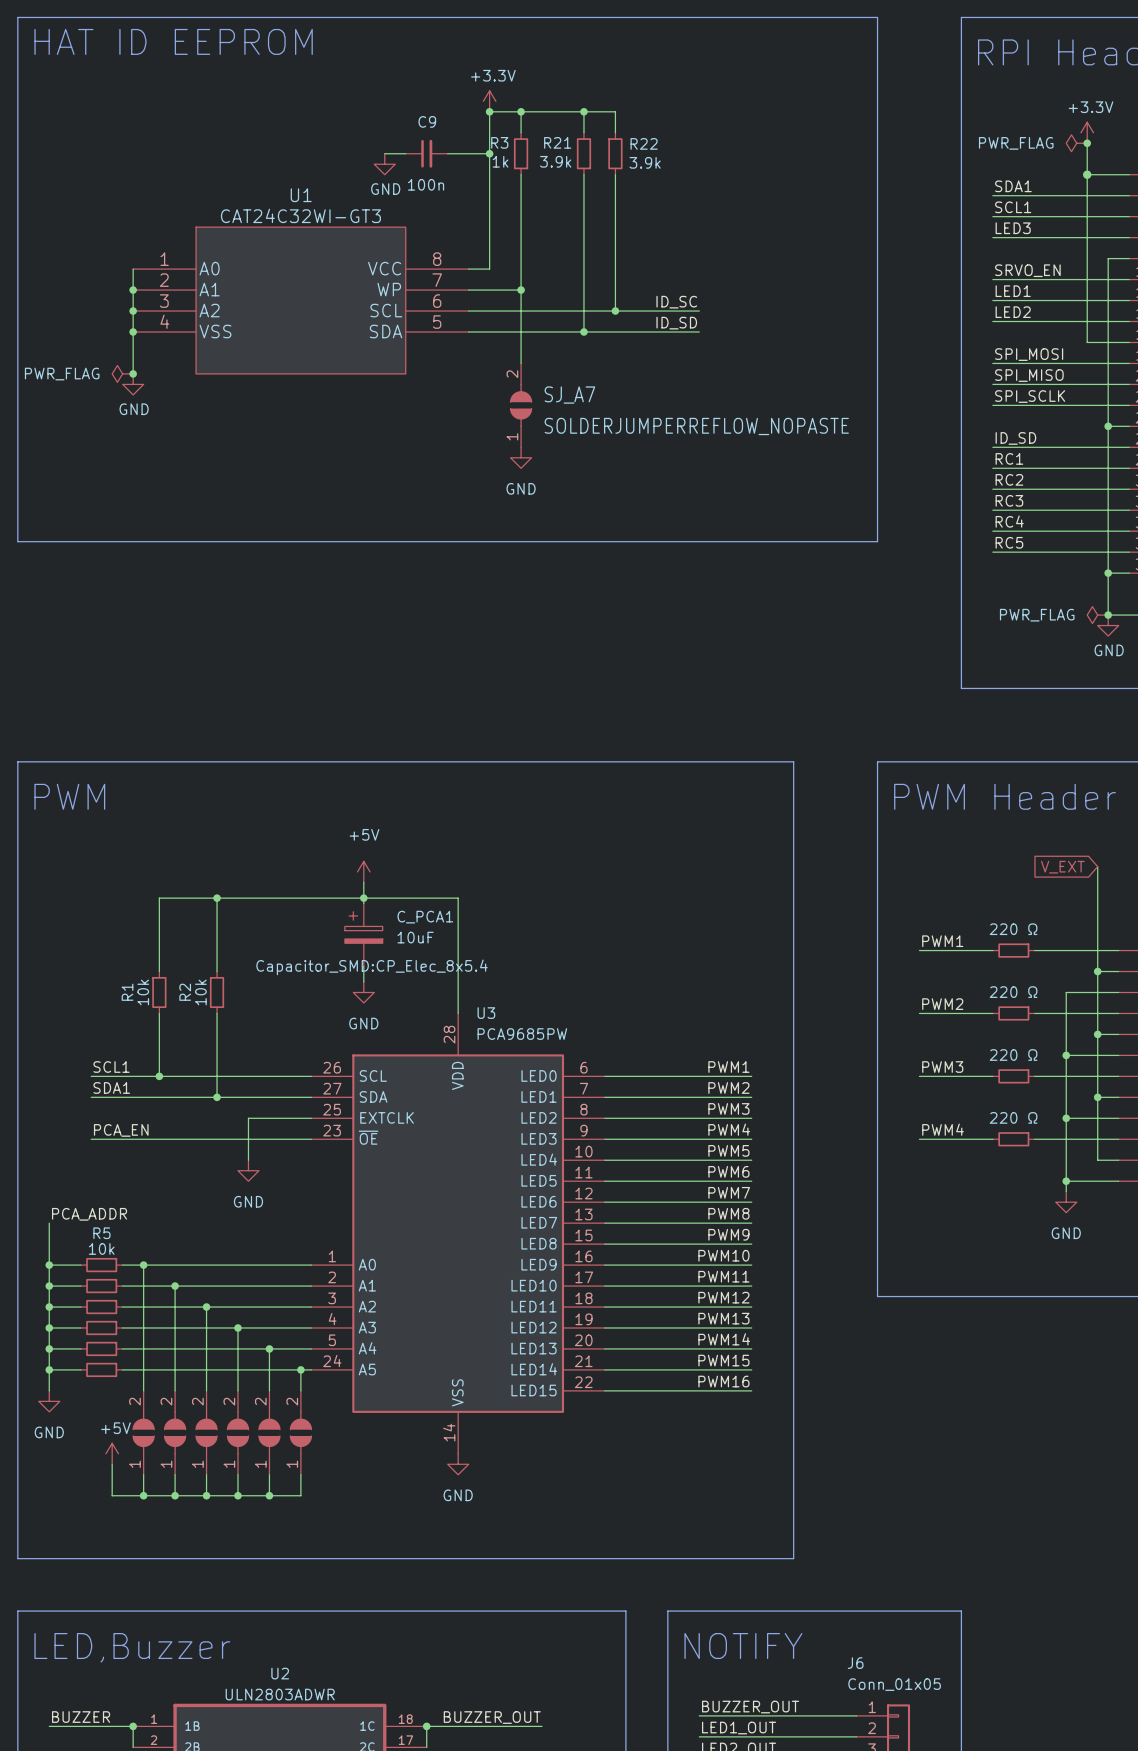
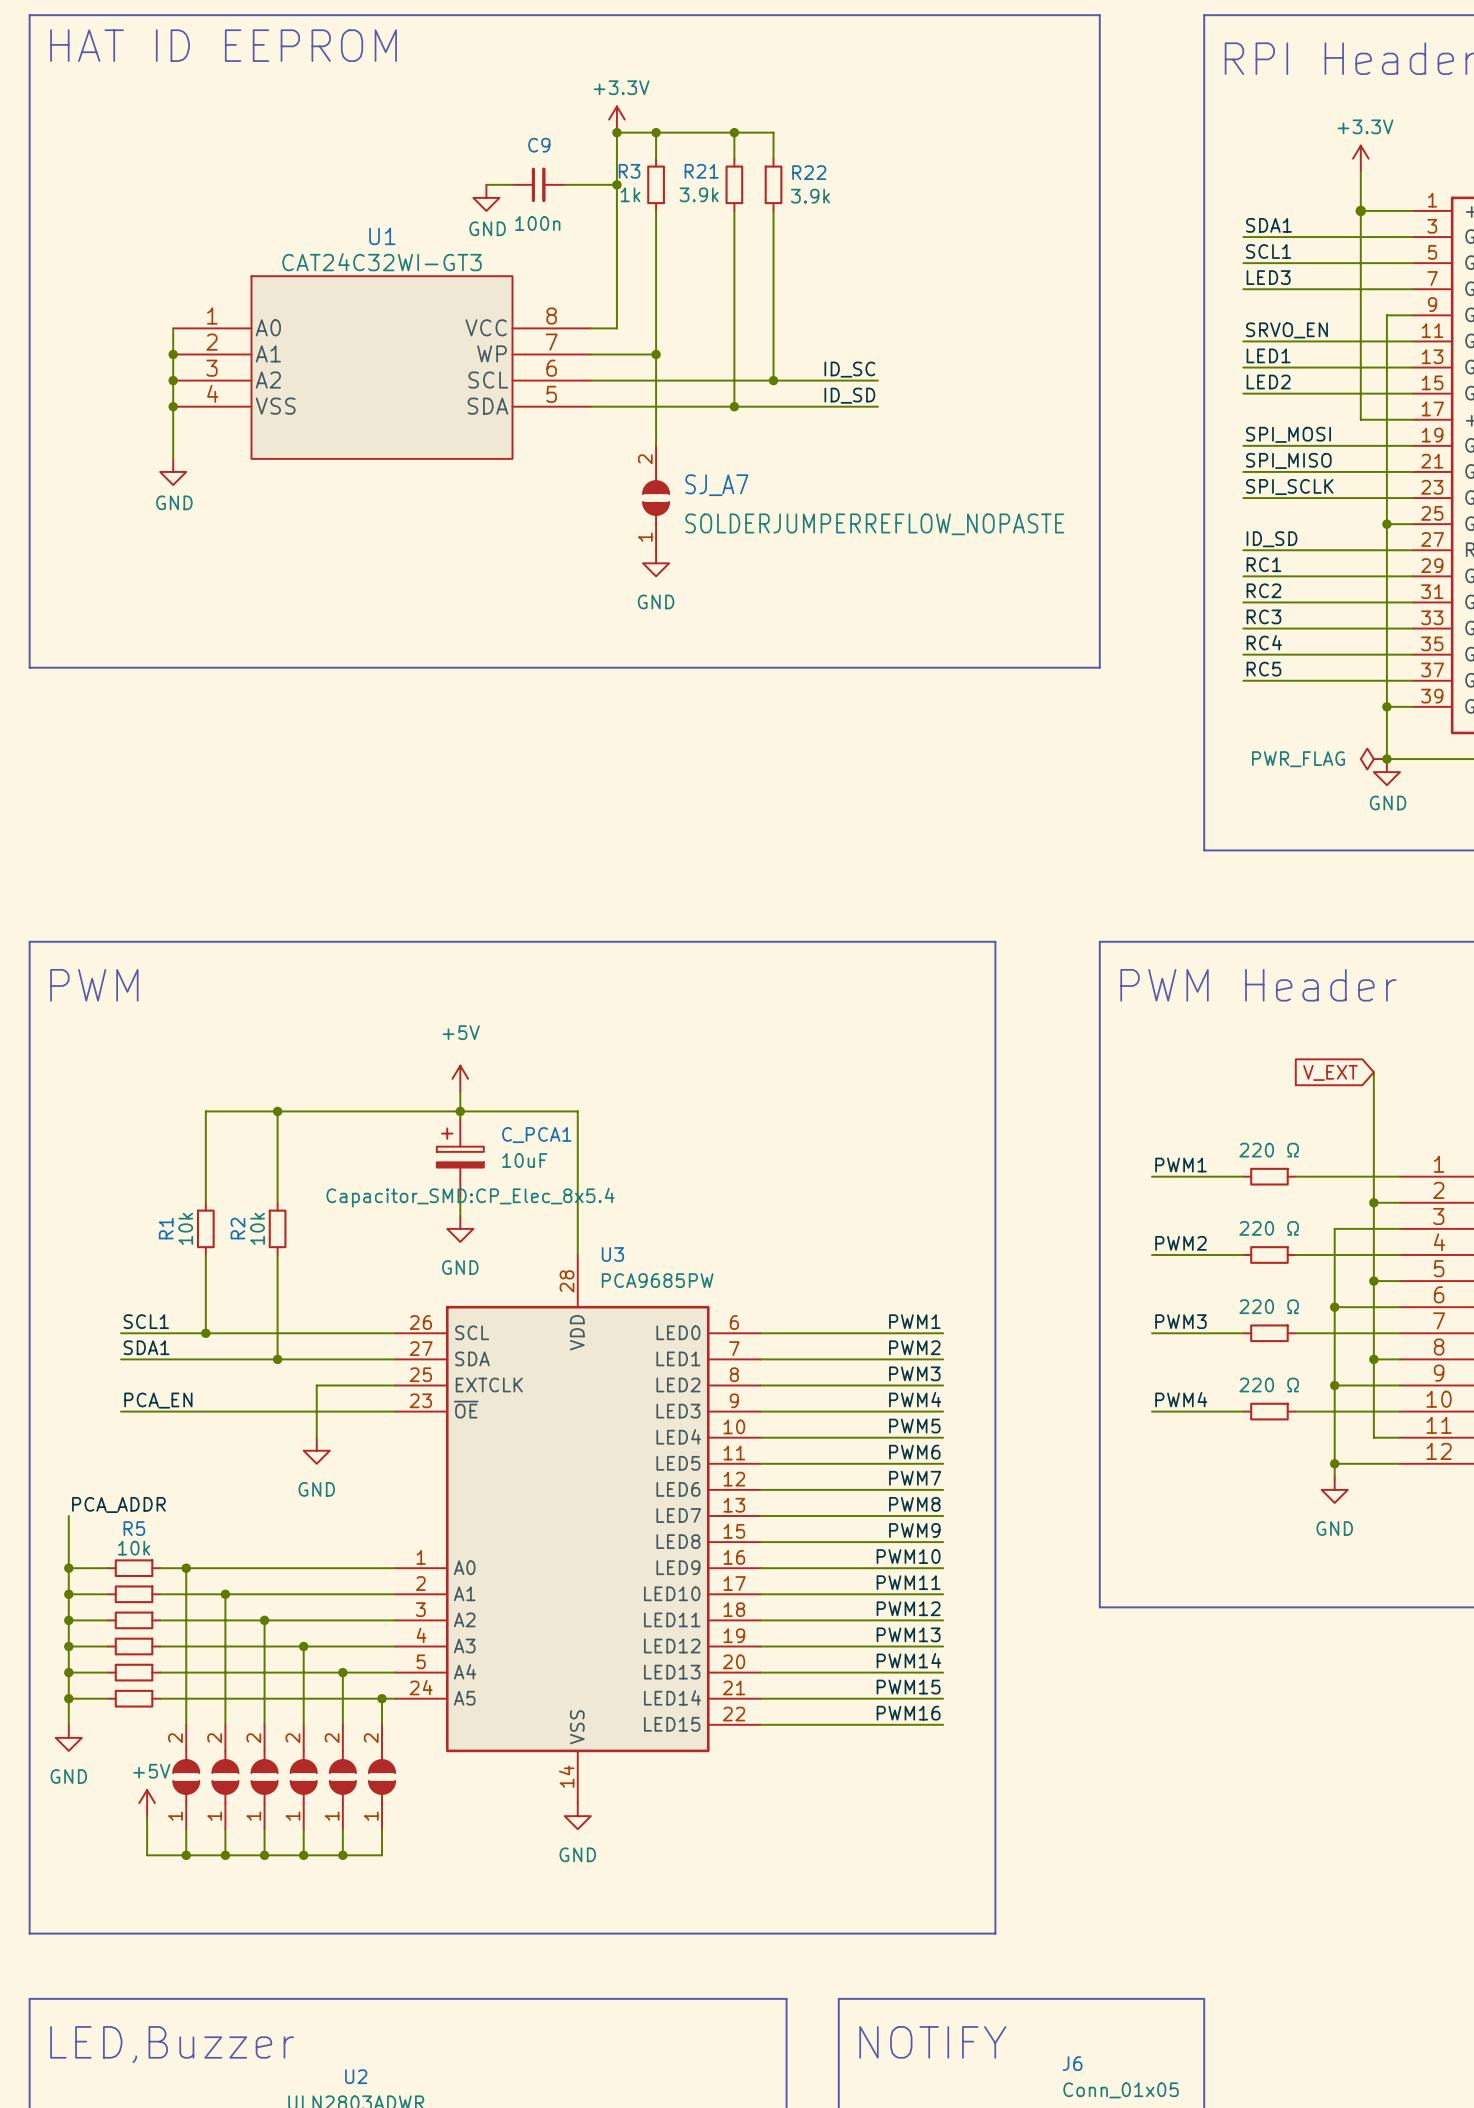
power symbol: PWR_FLAG (1076, 143) -> none
junction: (1087, 143) -> none
power symbol: PWR_FLAG (122, 373) -> none
junction: (133, 373) -> none

